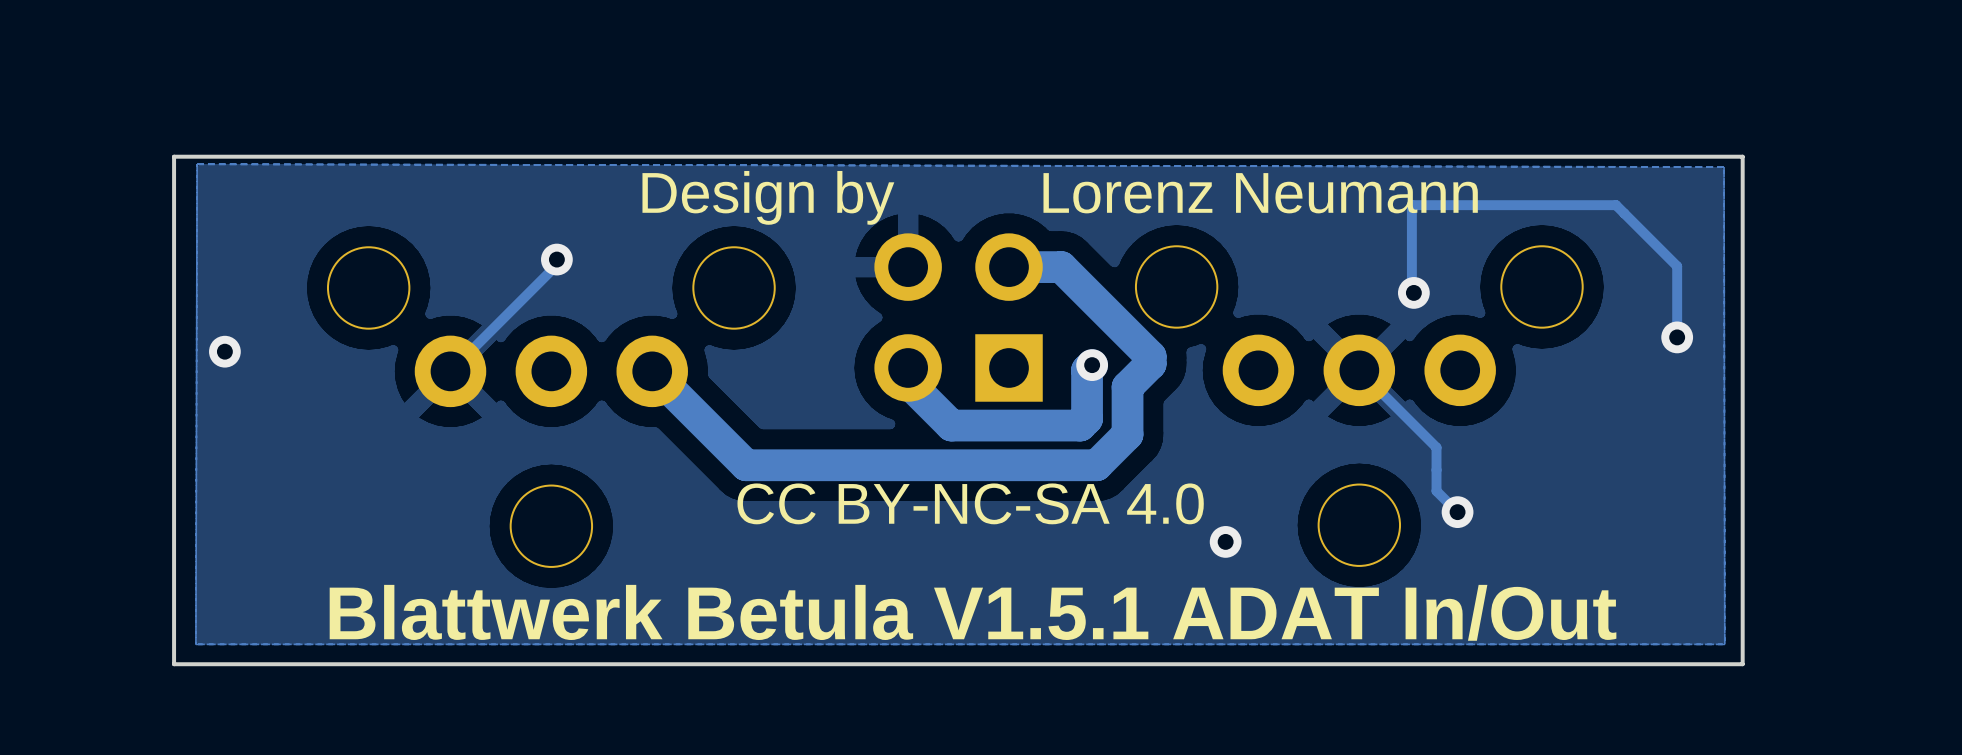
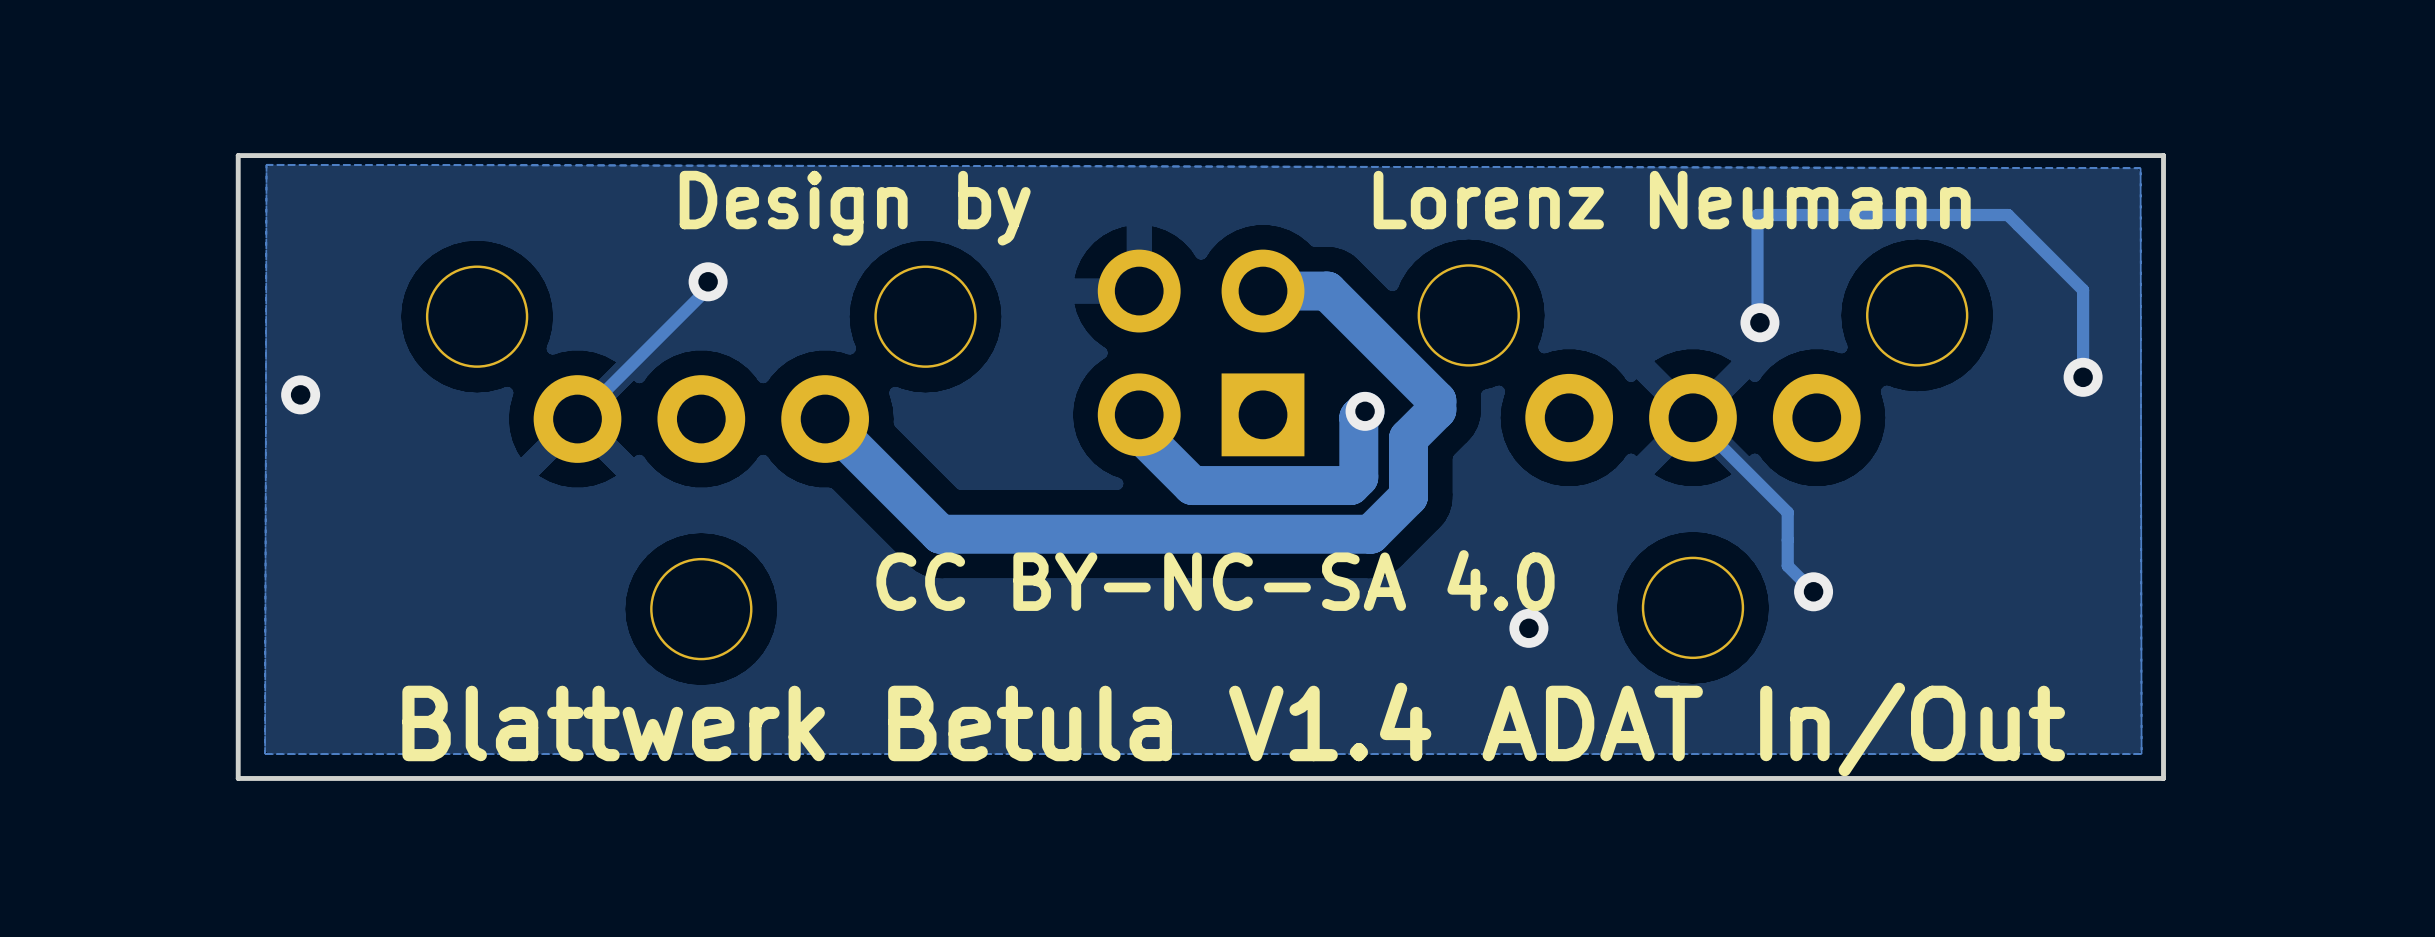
text: Blattwerk Betula V1.5.1 ADAT In/Out (973, 612) -> Blattwerk Betula V1.4 ADAT In/Out (1233, 729)

